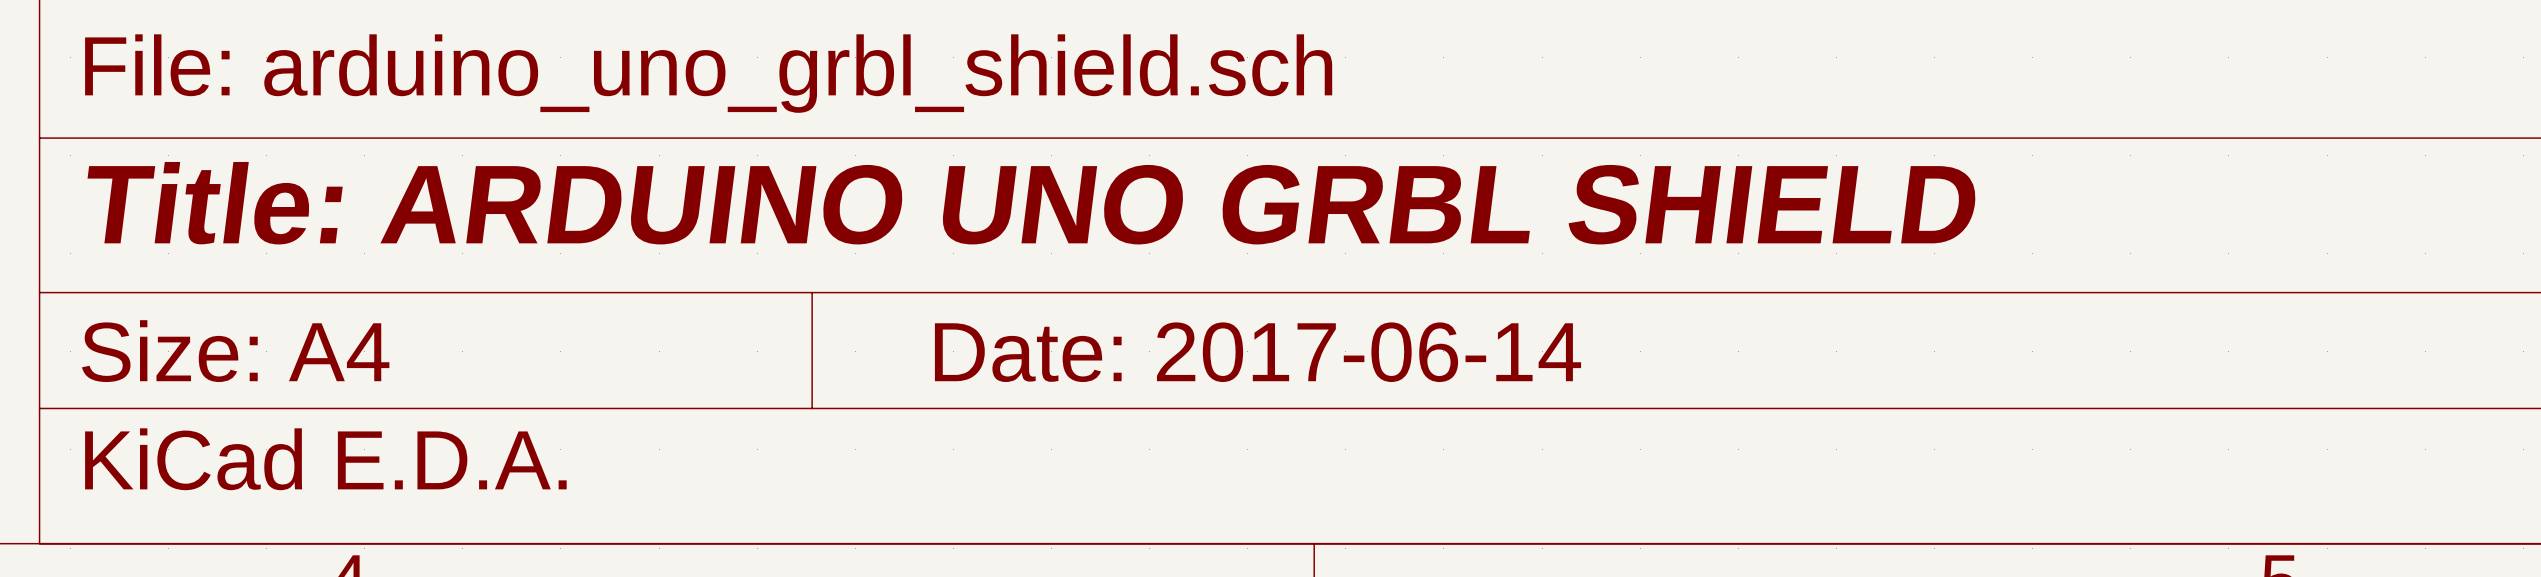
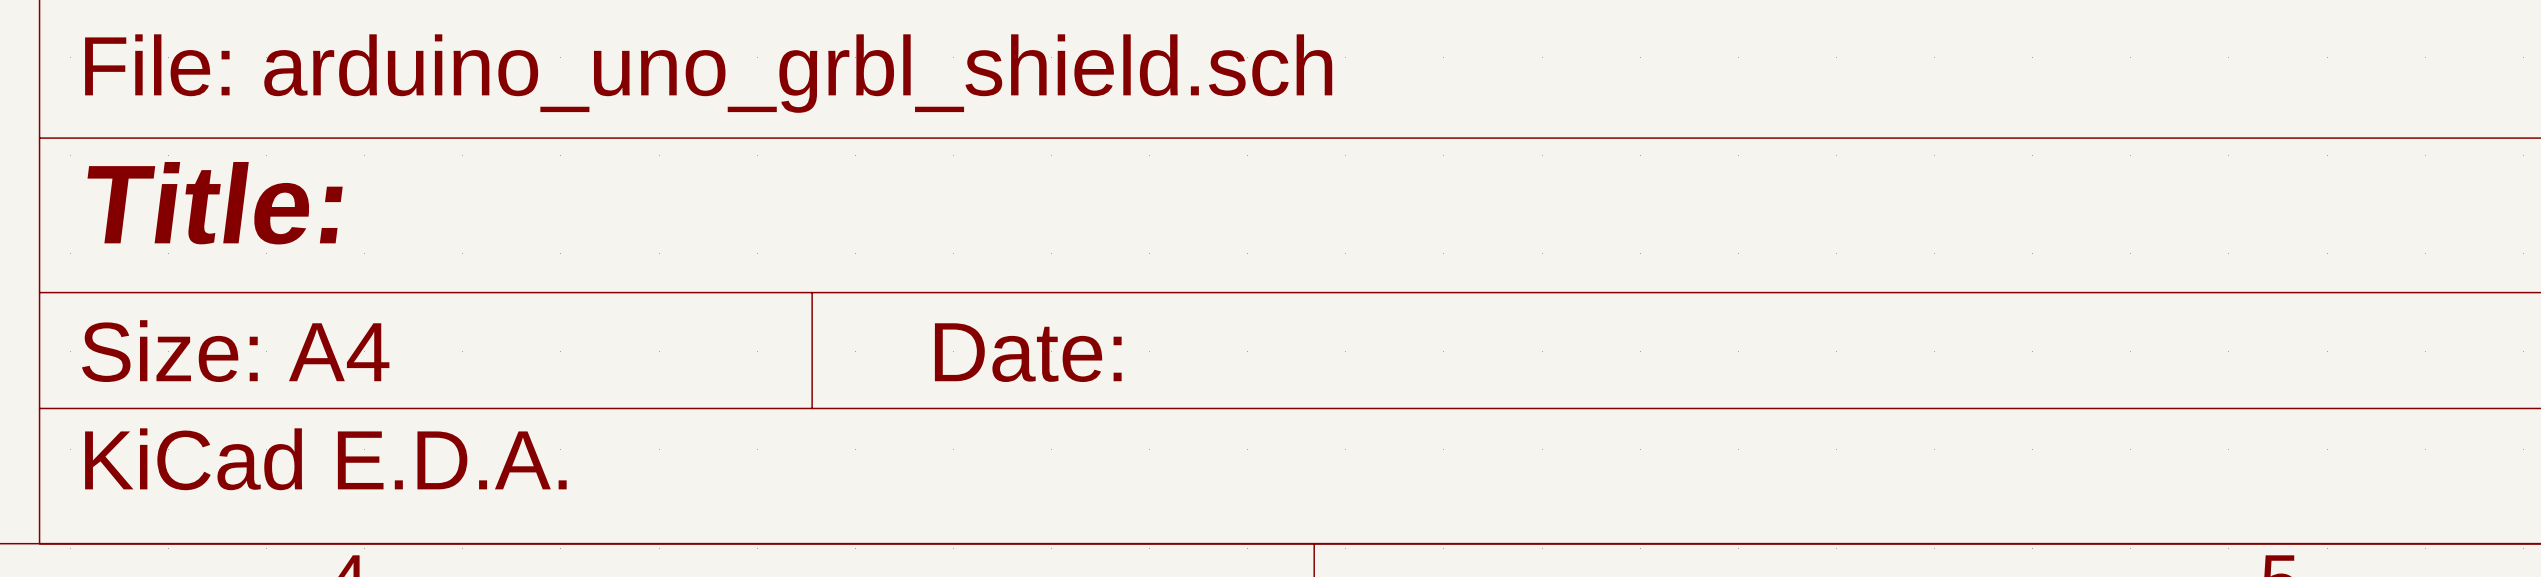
title block: Title: ARDUINO UNO GRBL SHIELD (1032, 203) -> Title: (215, 203)
title block: Date: 2017-06-14 (1257, 352) -> Date: (1028, 352)

